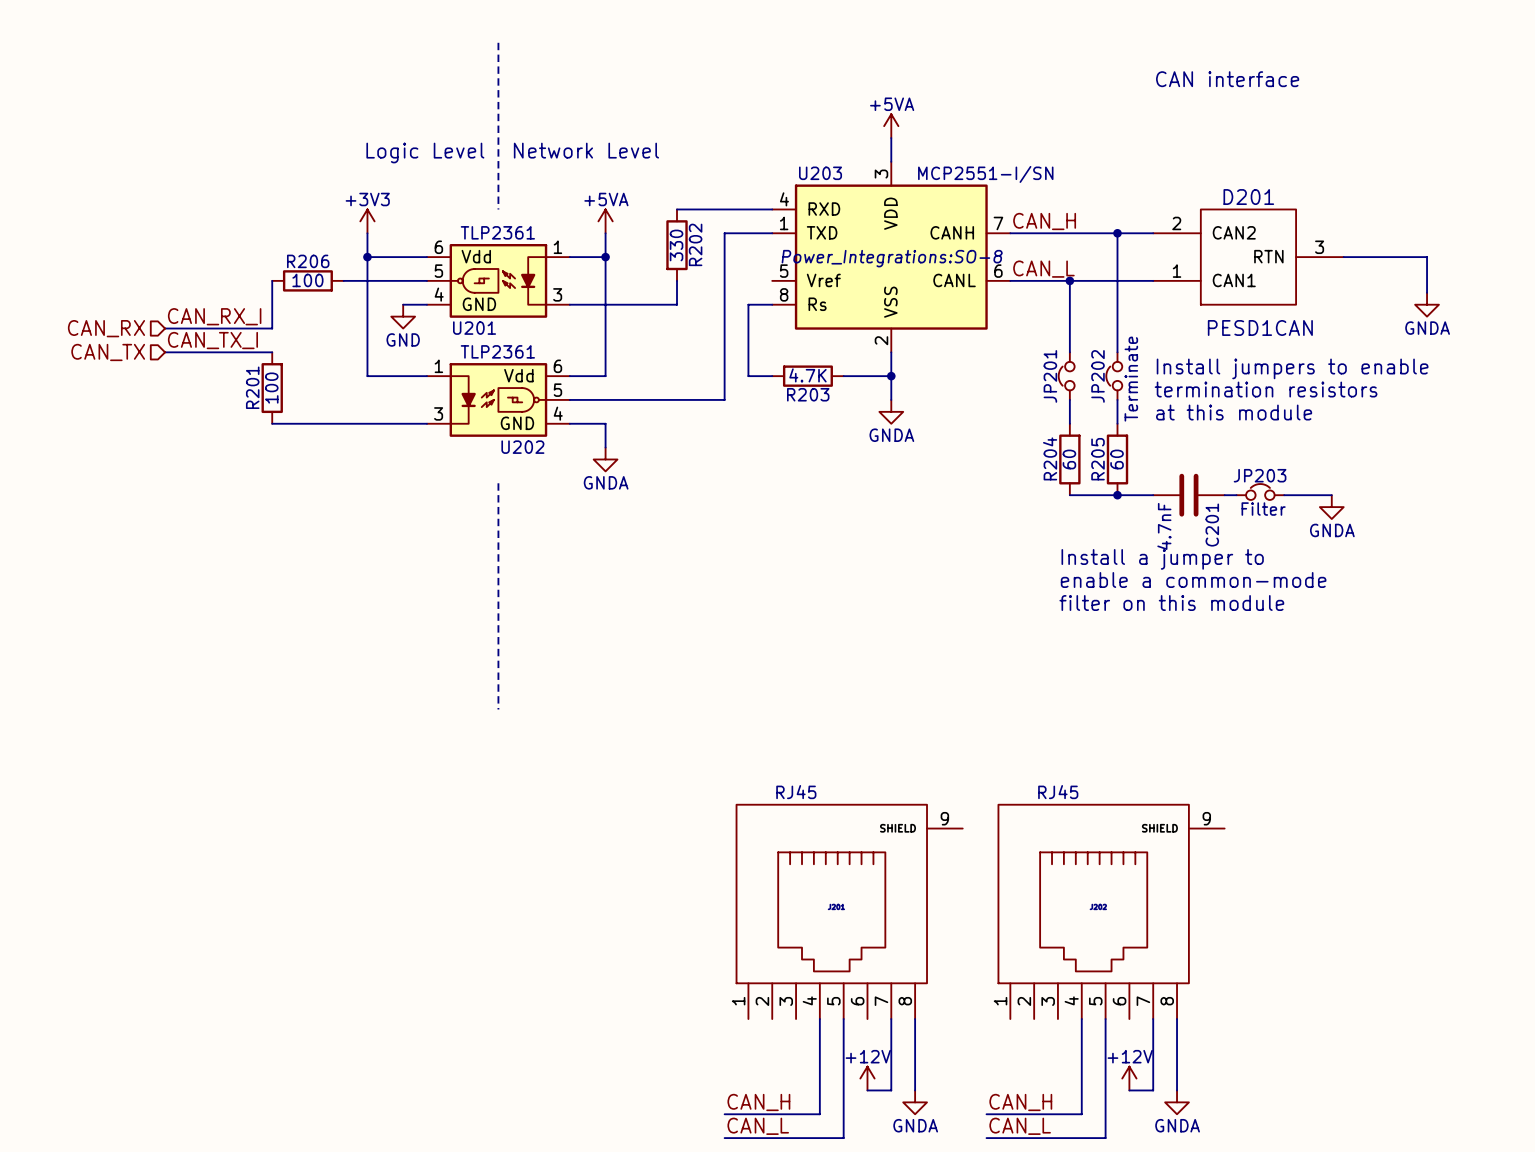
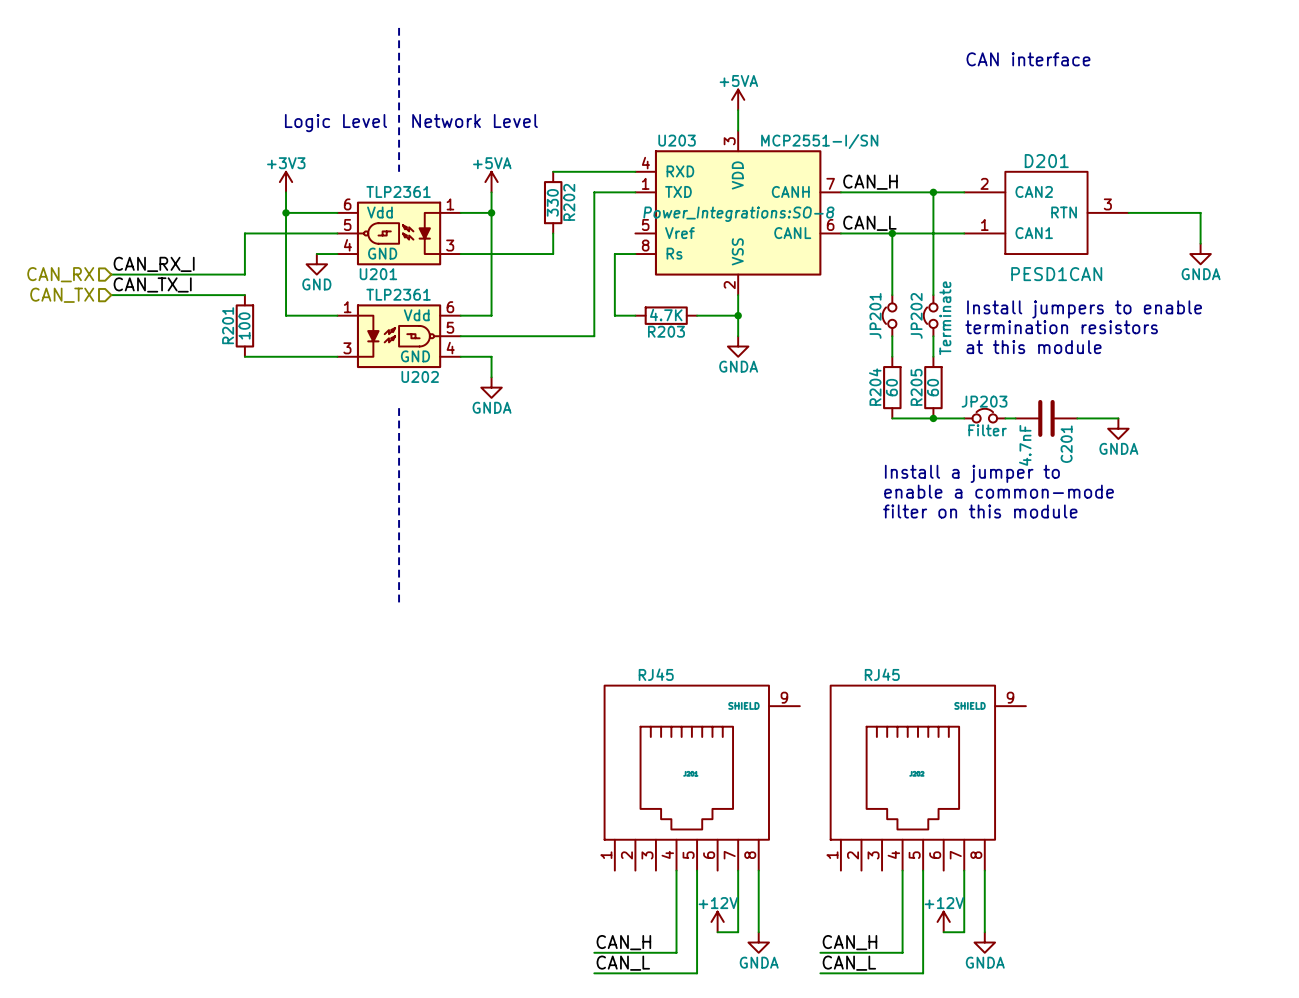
wire: (272, 280) (272, 328) -> (265, 233) (244, 233) (244, 274) (203, 274)
R206: 100 (307, 280) -> none
R201 position: (272, 388) -> (244, 325)
wire: (272, 423) (319, 423) -> (203, 295) (244, 295)
JP203 position: (1260, 491) -> (984, 415)
C201 position: (1188, 495) -> (1046, 418)

